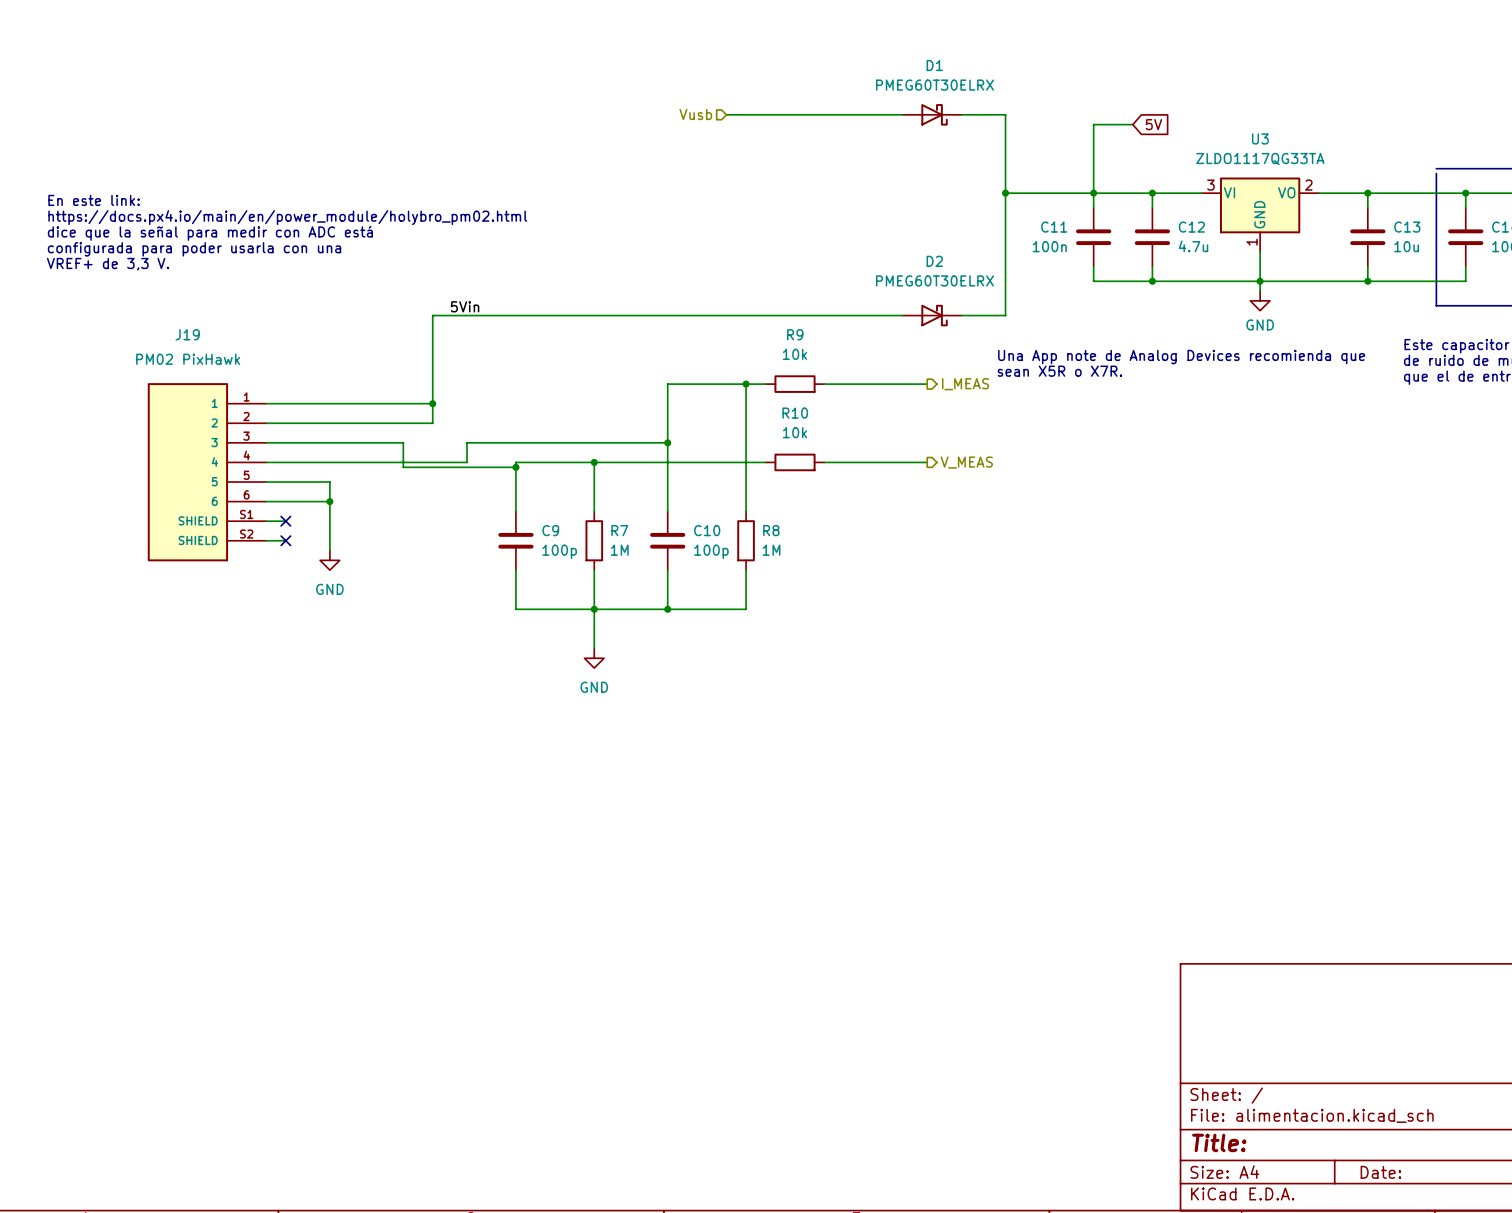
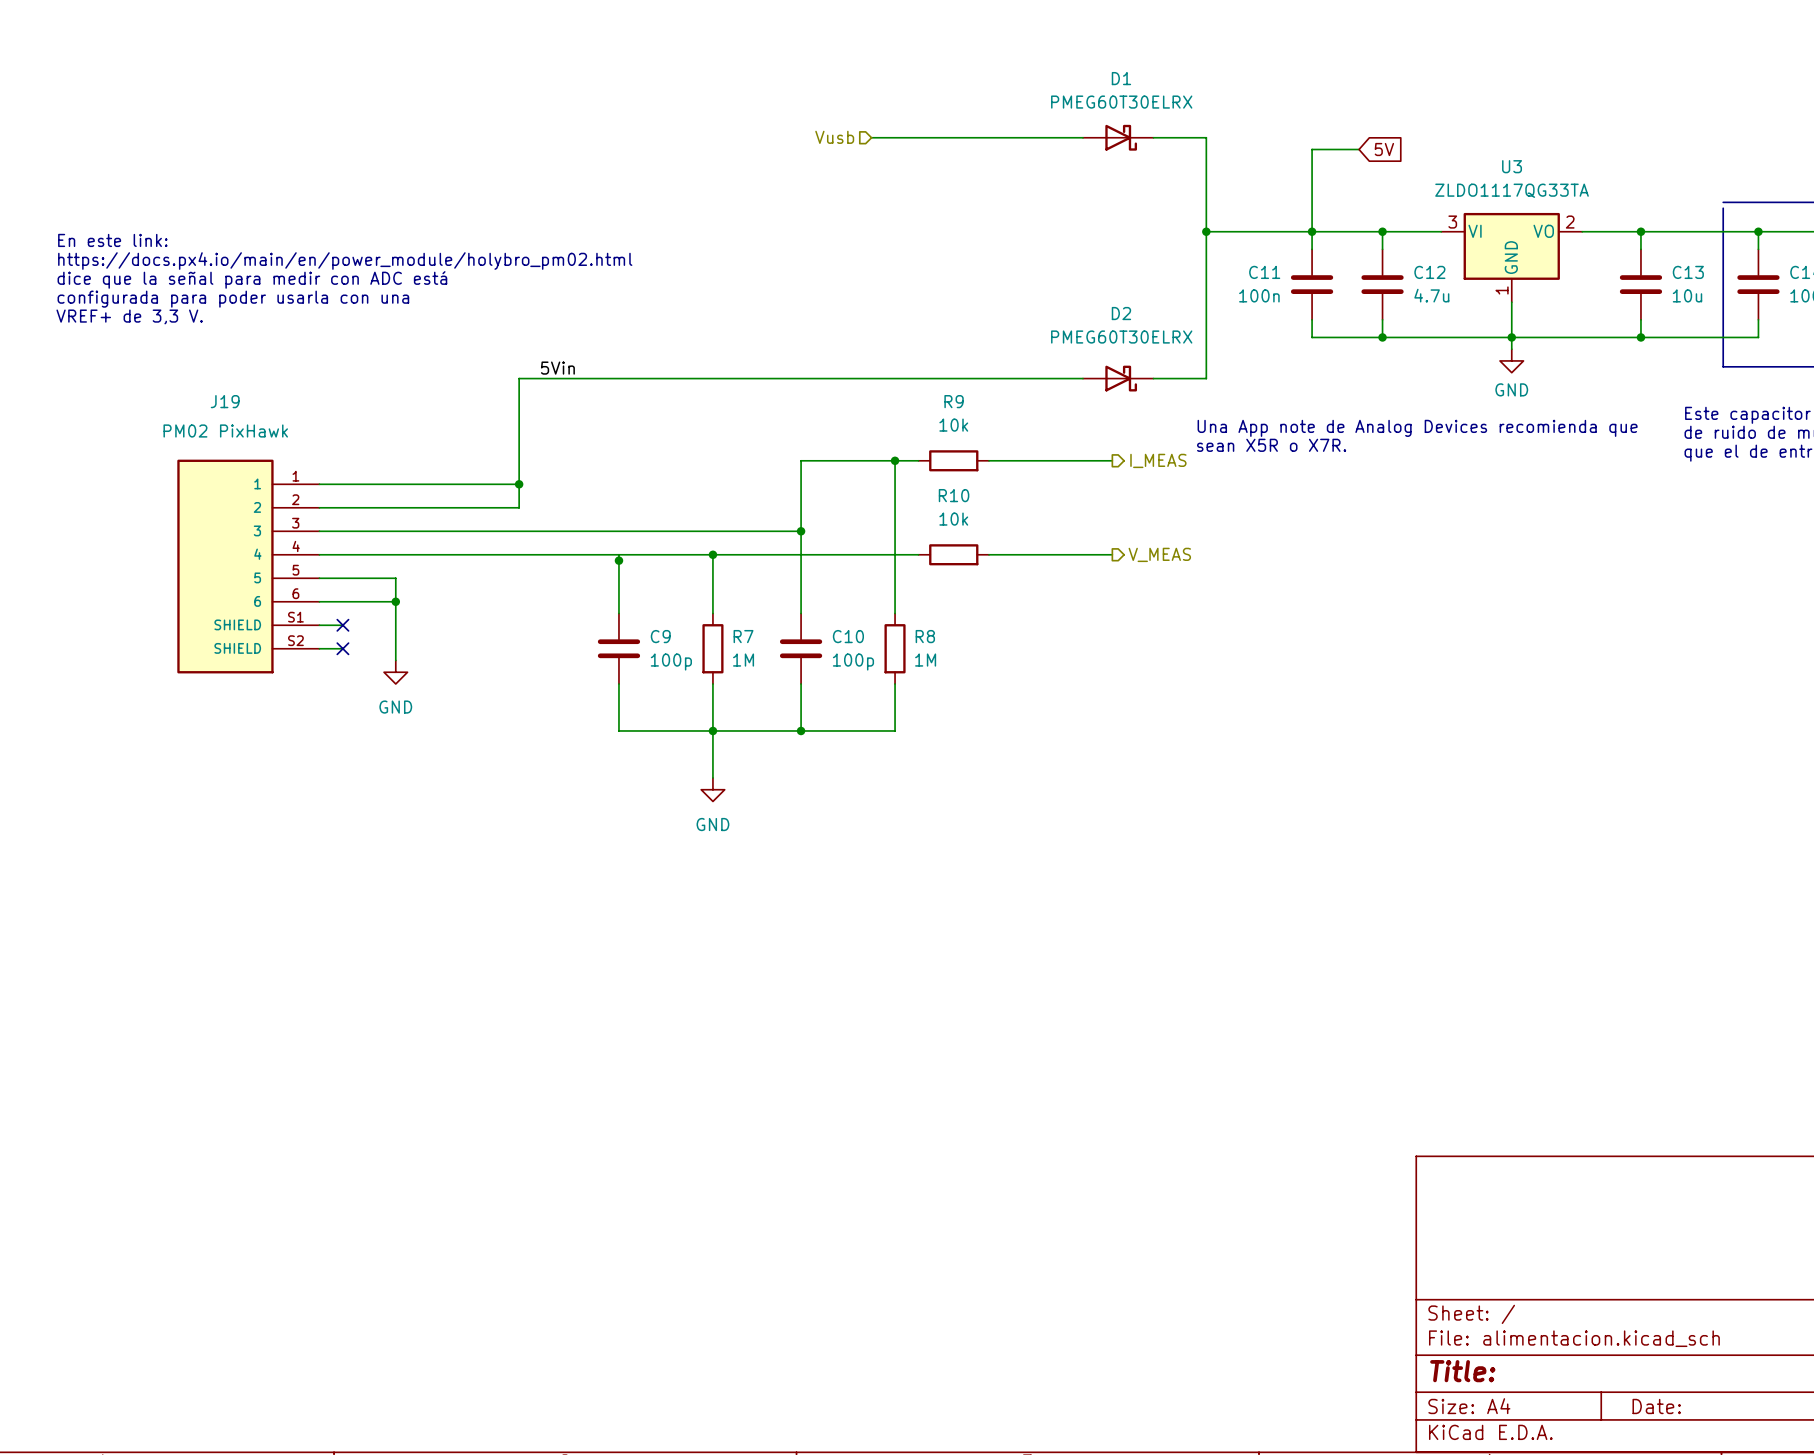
wire: (403, 442) (403, 467) (515, 467) -> (483, 531) (560, 531)
wire: (466, 442) (466, 462) -> (618, 554) (560, 554)

